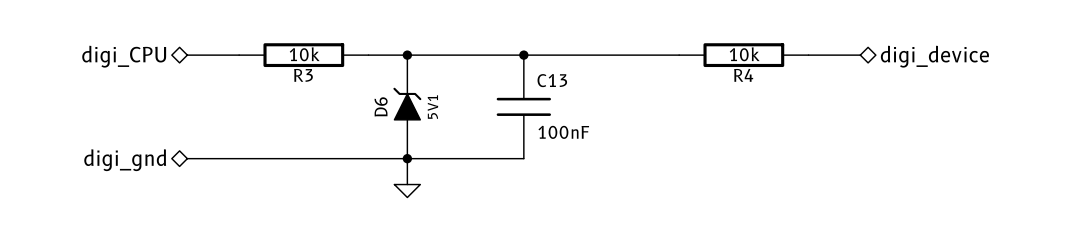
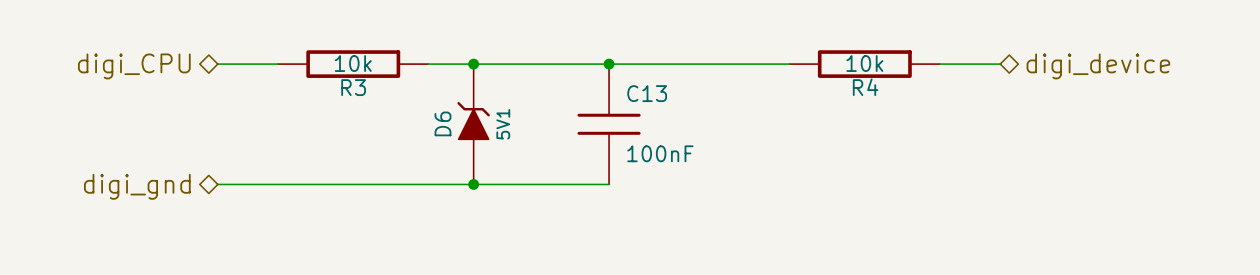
wire: (407, 158) (407, 184) -> none
power symbol: (407, 191) -> none

